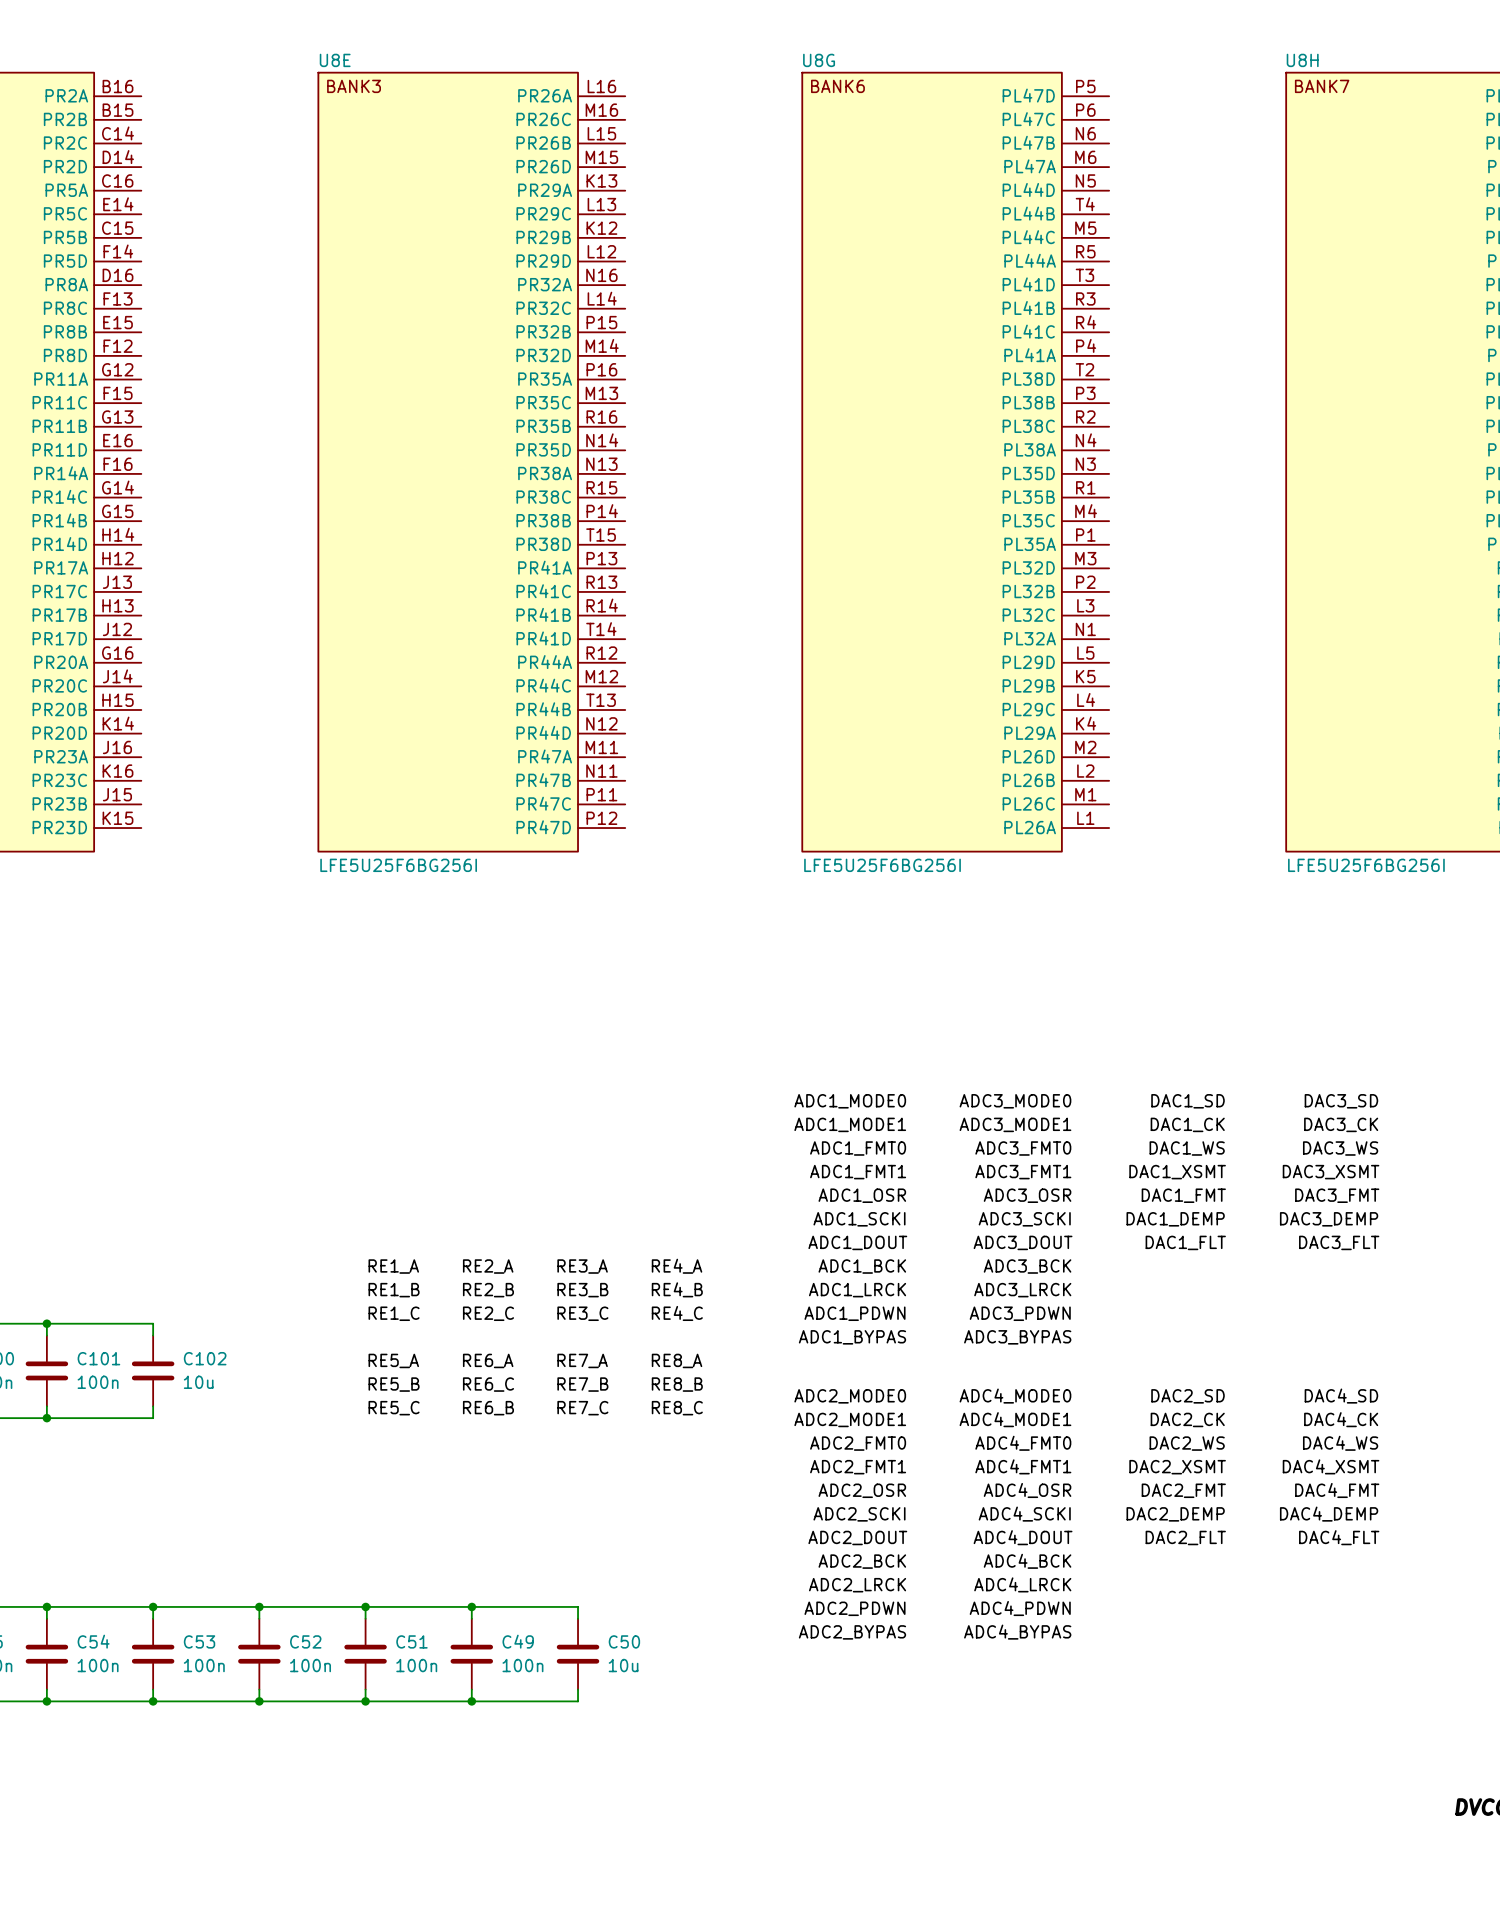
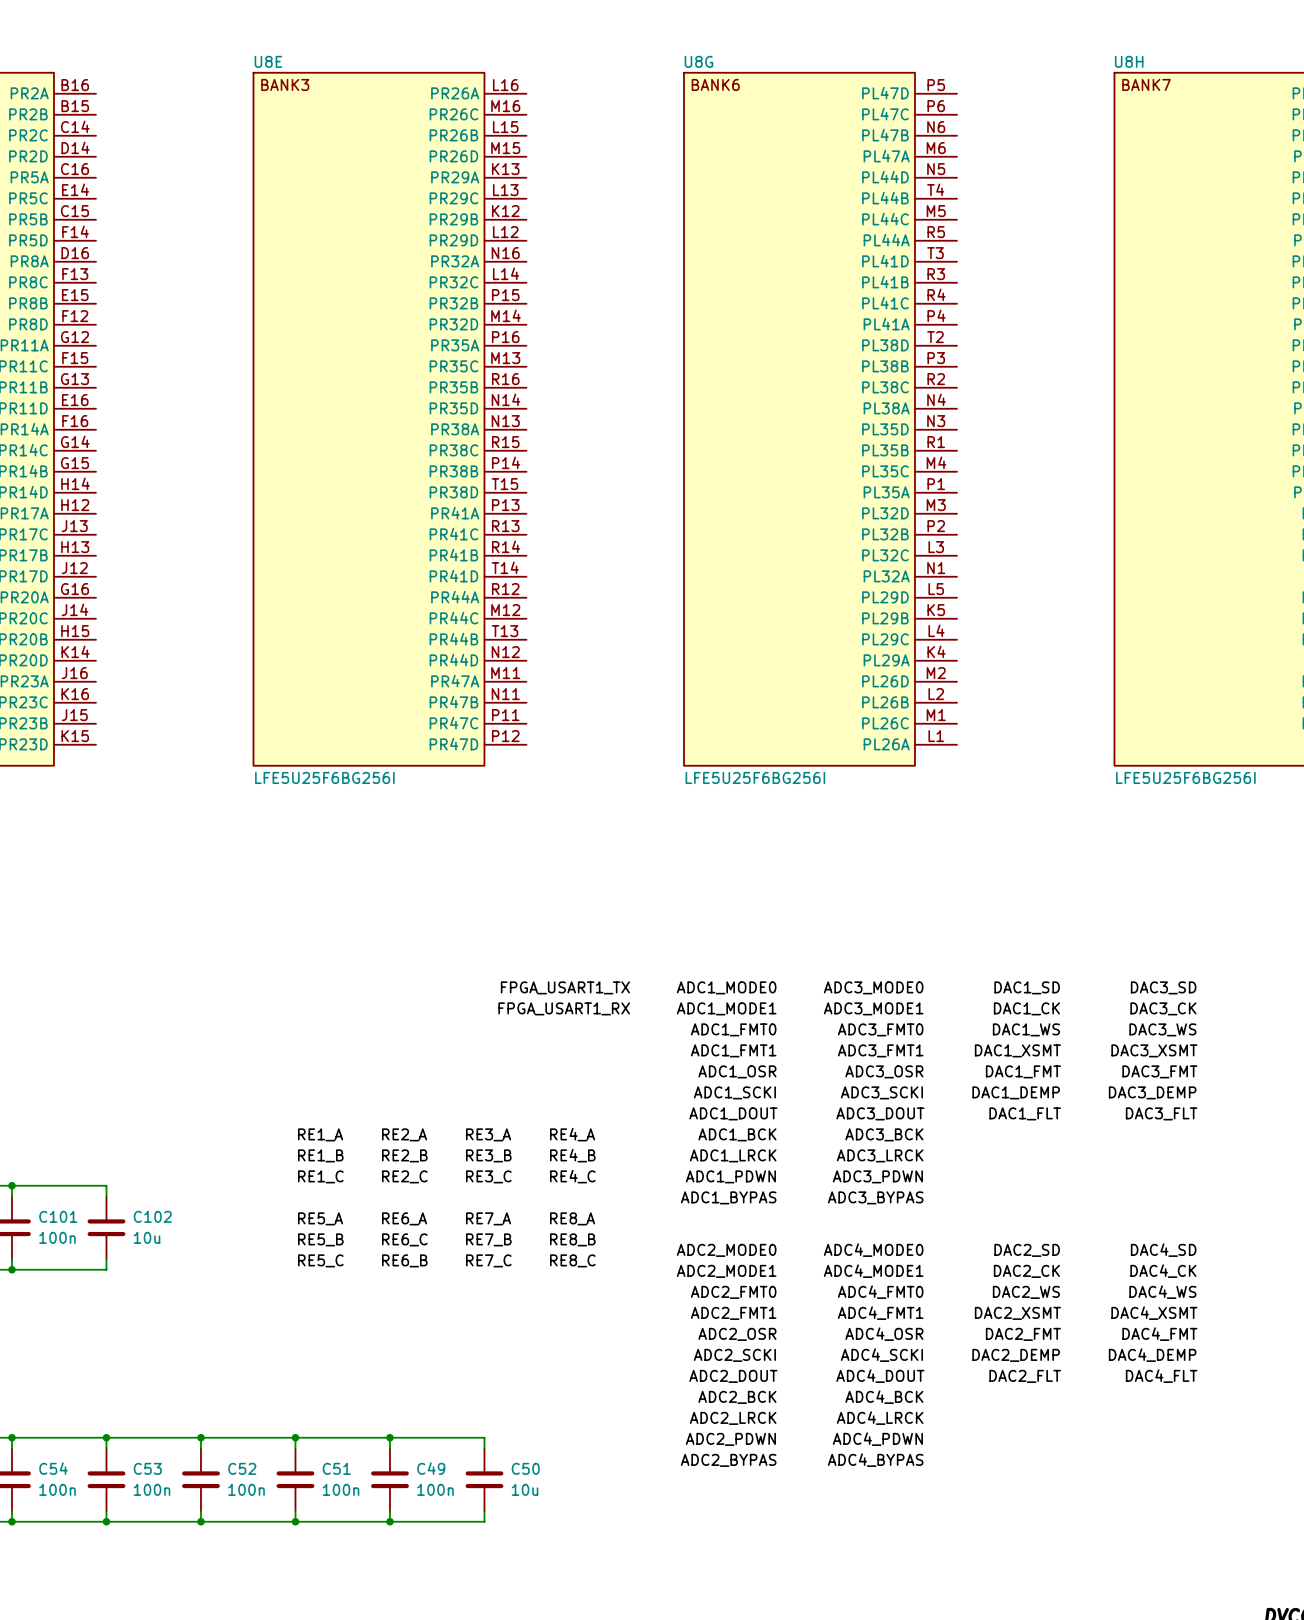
label: none -> FPGA_USART1_TX (565, 987)
label: none -> FPGA_USART1_RX (564, 1008)

